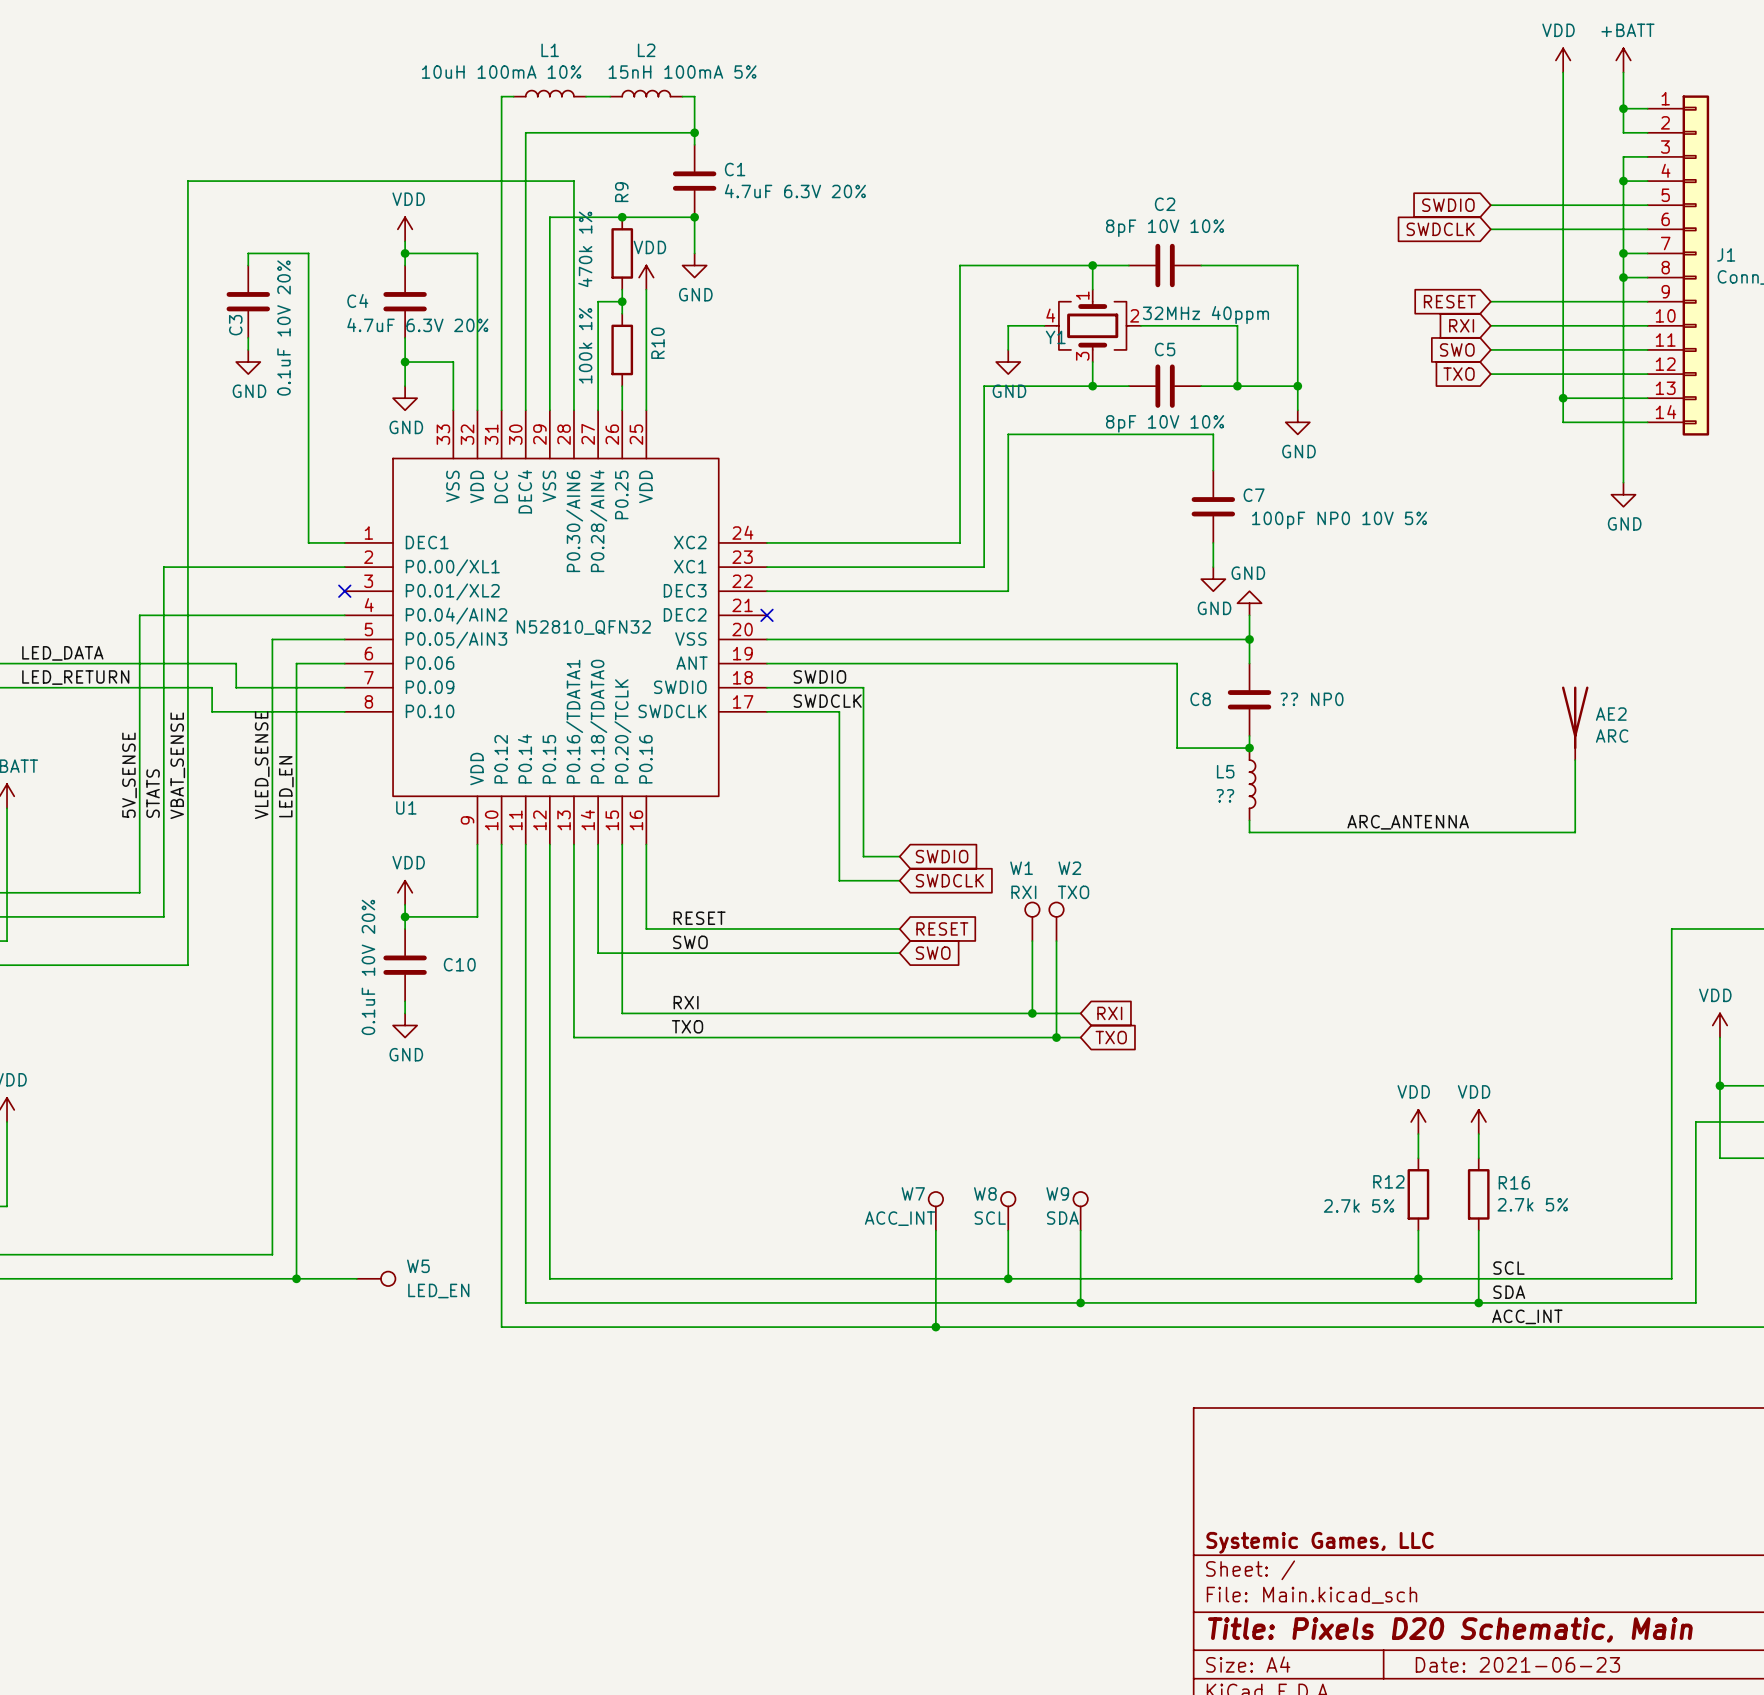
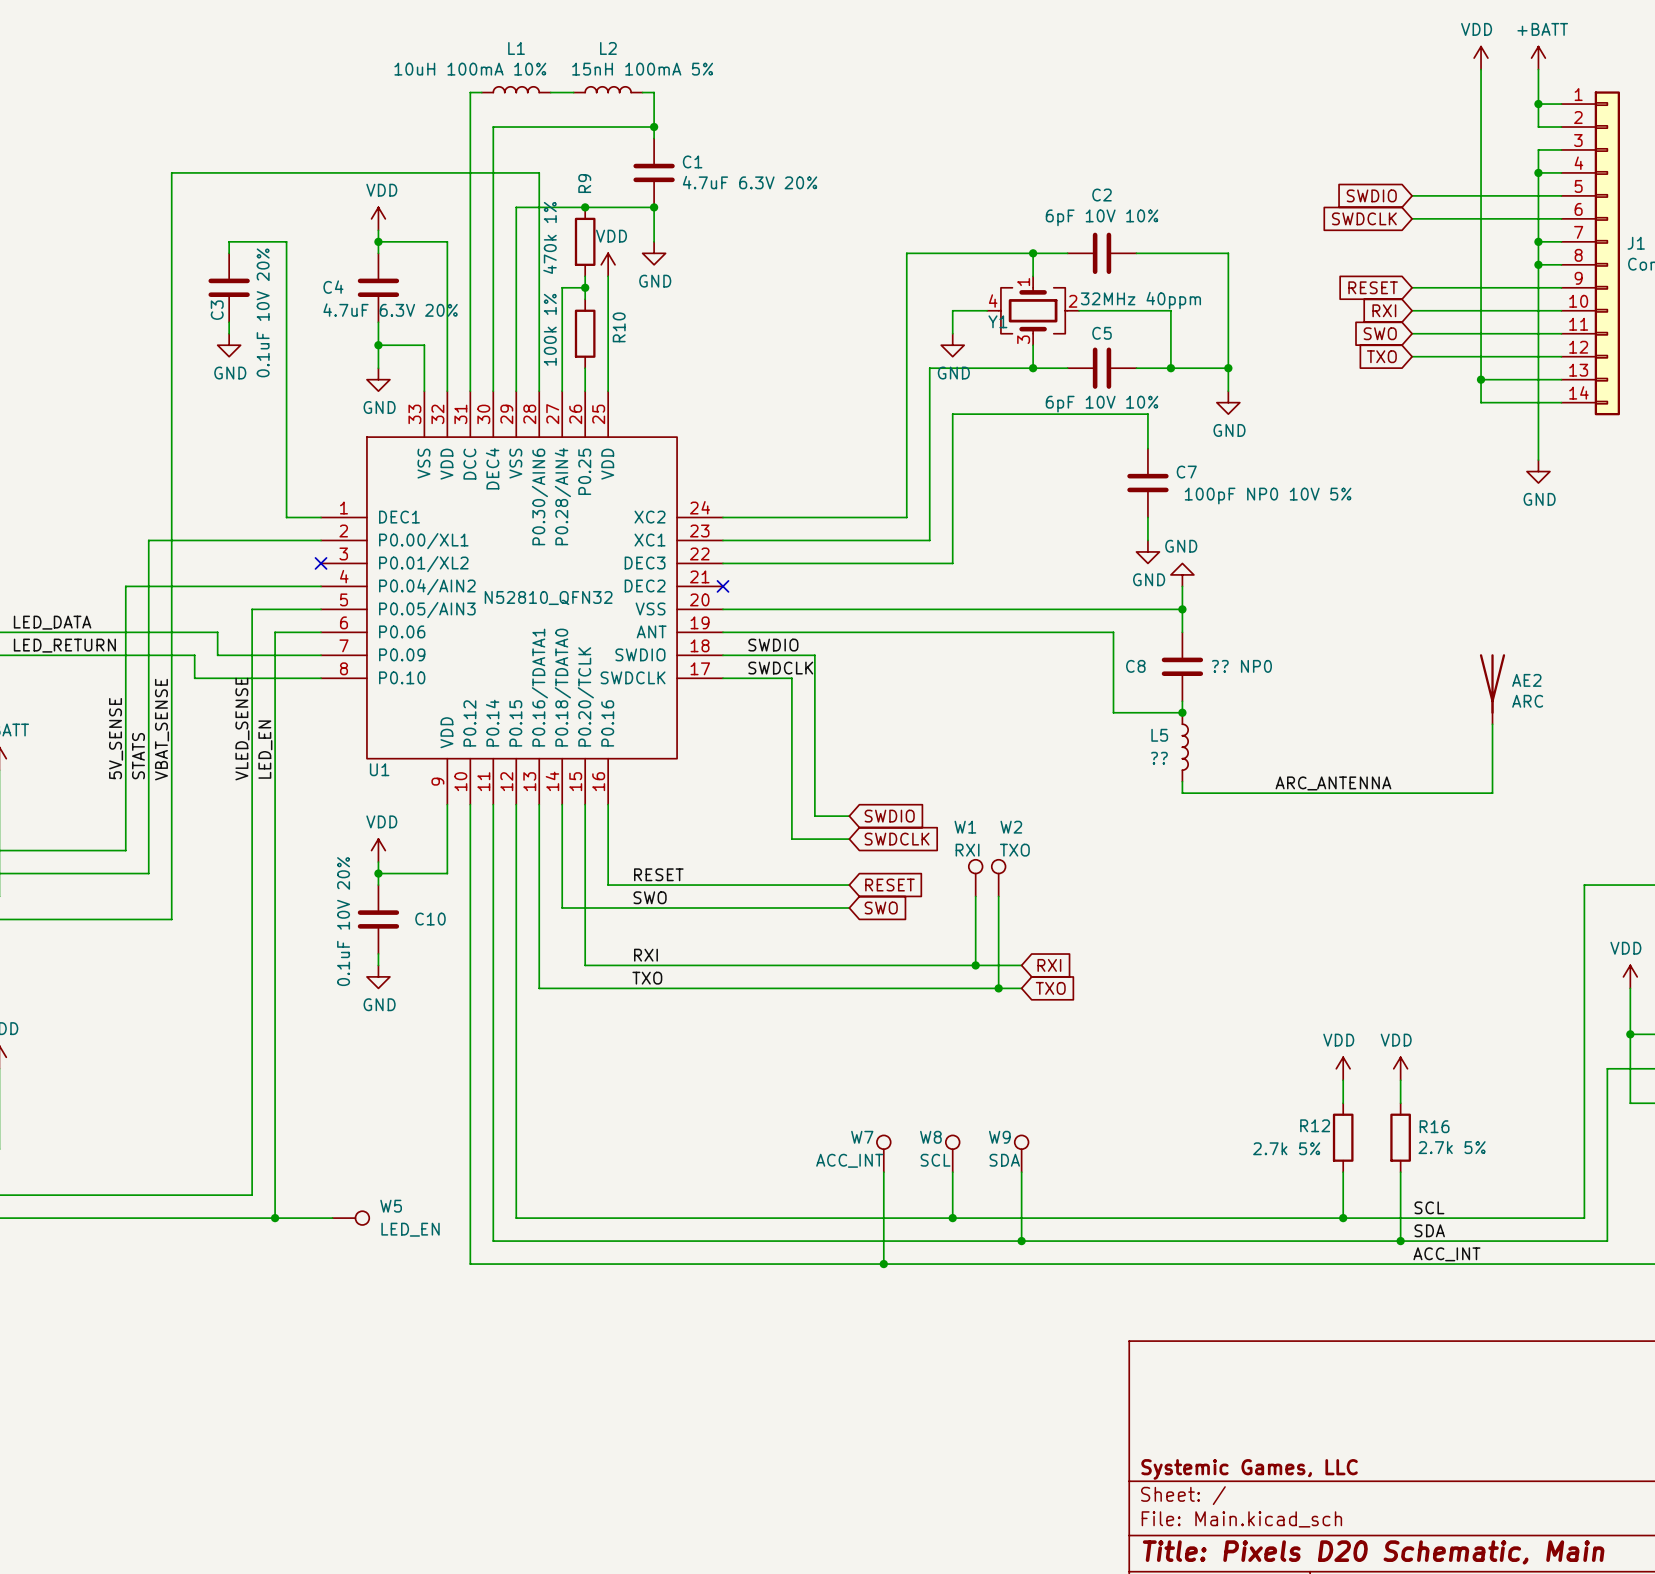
C2 value: 8pF 10V 10% (1165, 228) -> 6pF 10V 10% (1102, 217)
C5 value: 8pF 10V 10% (1165, 423) -> 6pF 10V 10% (1102, 404)

